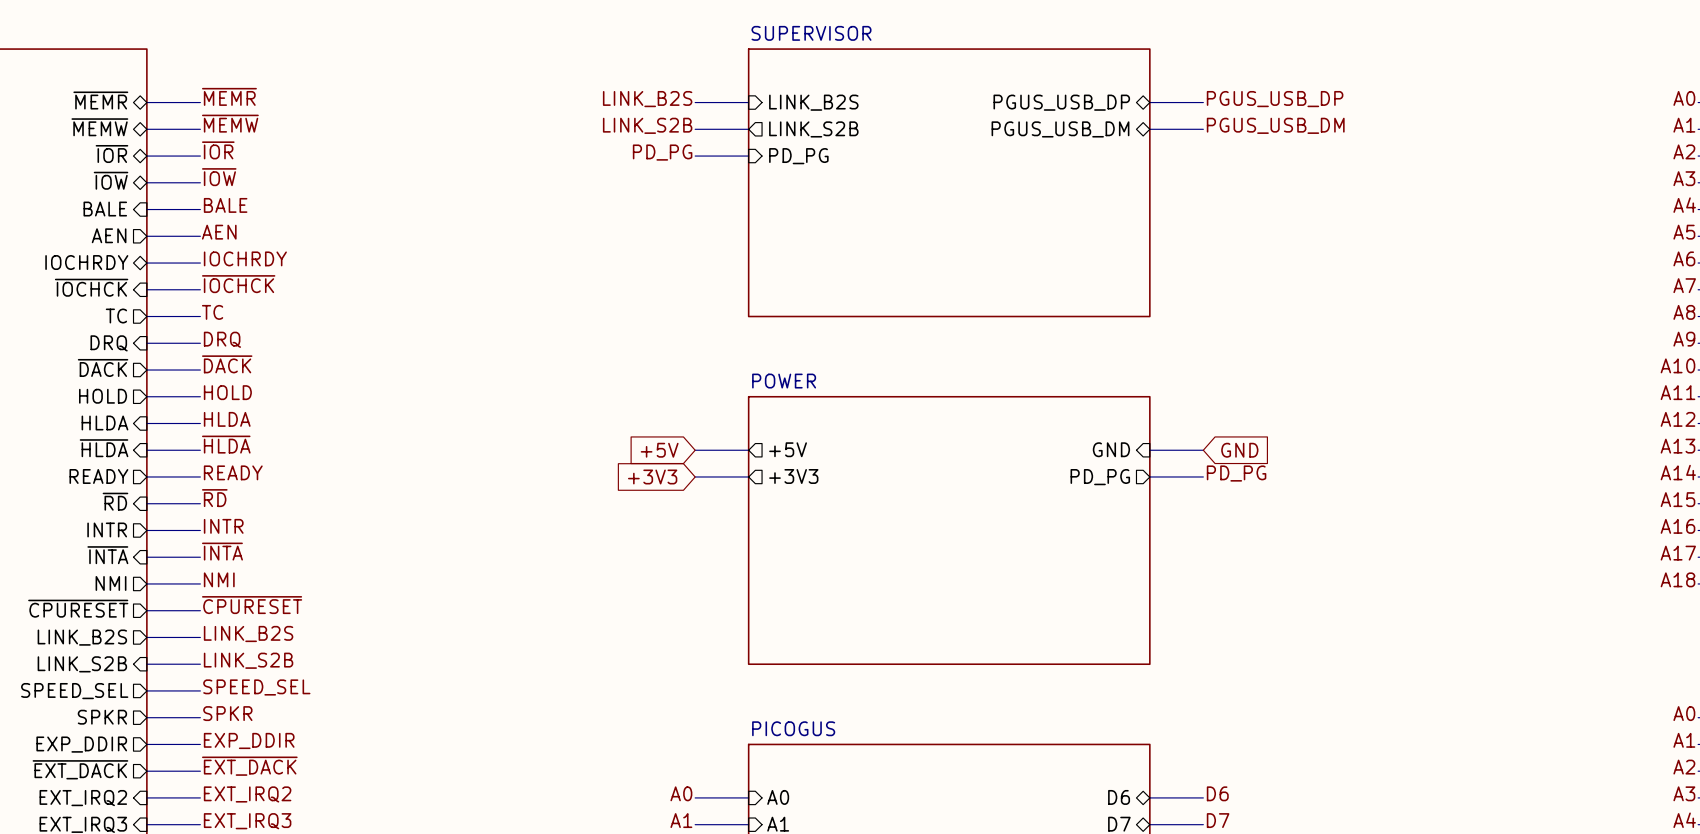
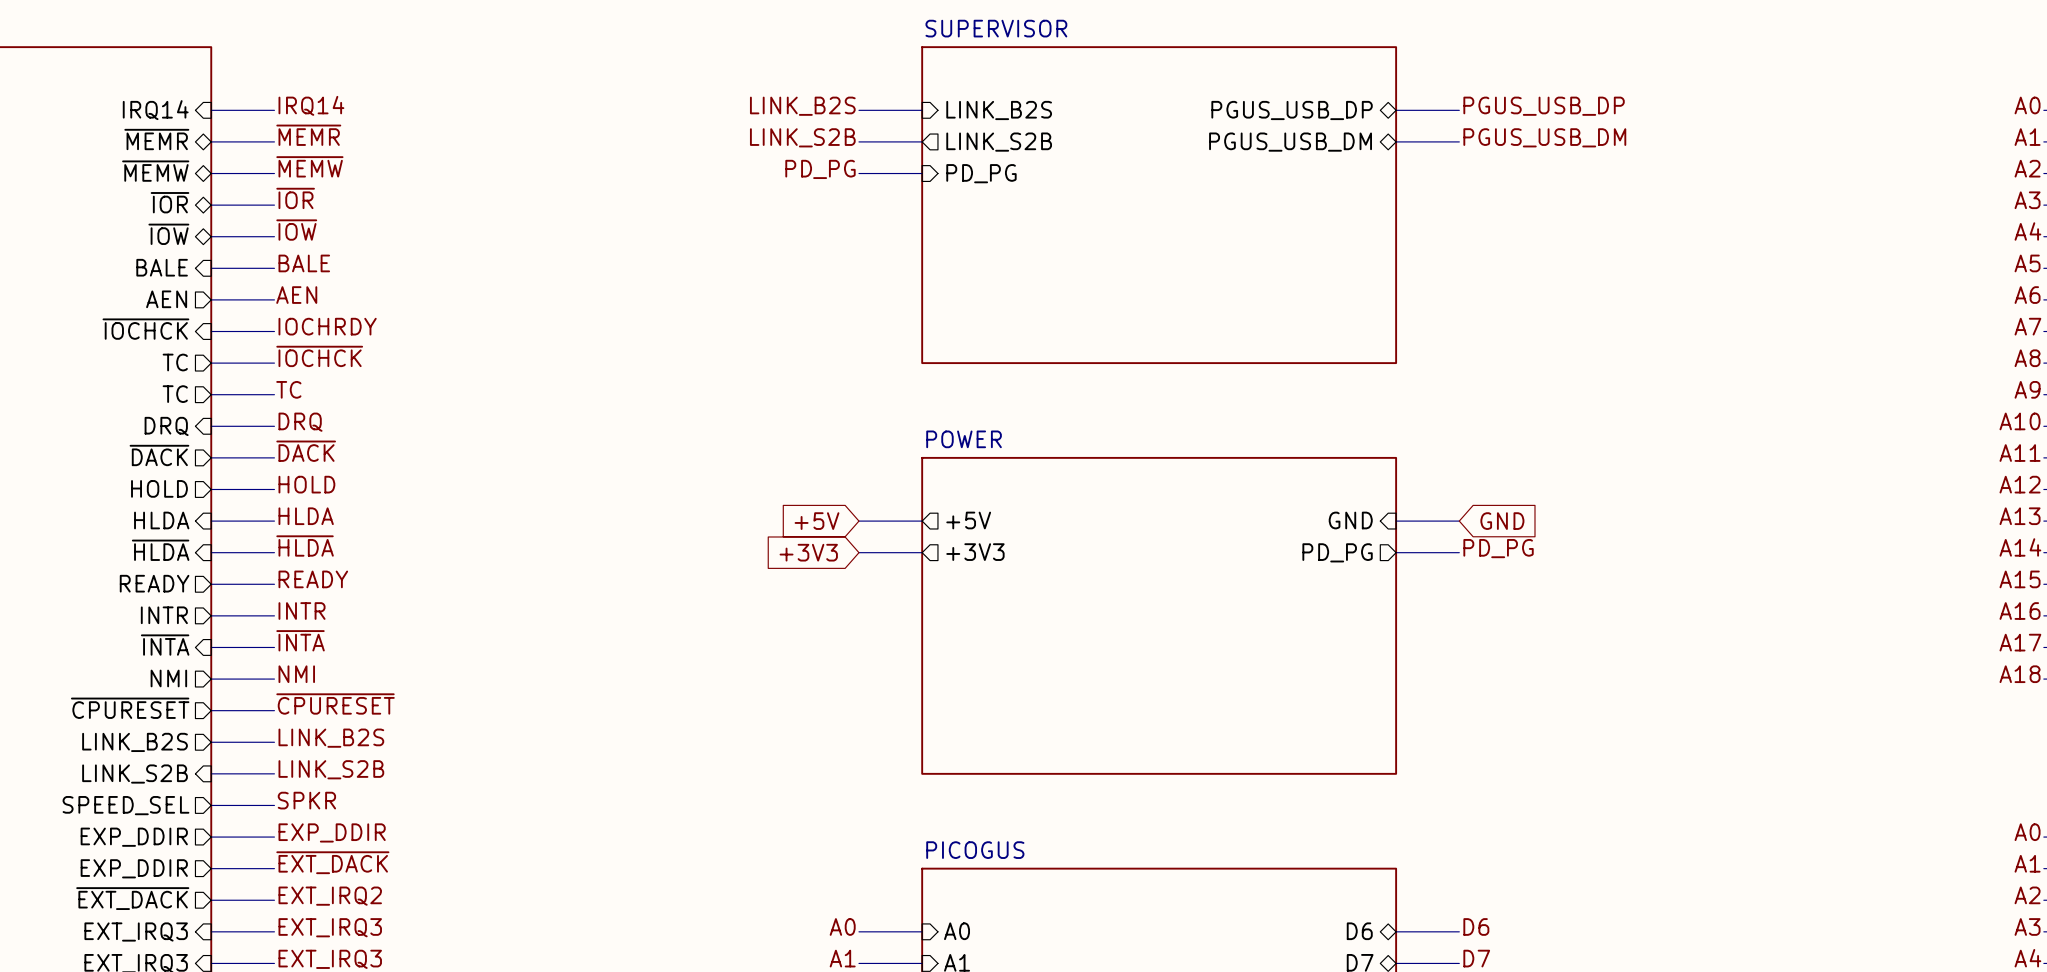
label: ~{MEMR} (229, 96) -> IRQ14 (311, 105)
sheet pin shape: bidirectional (100, 100) -> input (155, 110)
sheet pin: ~{MEMR} (100, 100) -> IRQ14 (155, 110)
label: ~{MEMW} (230, 123) -> ~{MEMR} (308, 135)
sheet pin: ~{MEMW} (99, 127) -> ~{MEMR} (156, 139)
label: ~{IOR} (218, 150) -> ~{MEMW} (309, 166)
sheet pin: ~{IOR} (111, 154) -> ~{MEMW} (155, 171)
label: ~{IOW} (219, 177) -> ~{IOR} (295, 198)
sheet pin: ~{IOW} (111, 180) -> ~{IOR} (170, 202)
label: BALE (225, 205) -> ~{IOW} (296, 230)
sheet pin shape: input (105, 209) -> bidirectional (168, 234)
sheet pin: BALE (105, 209) -> ~{IOW} (168, 234)
label: AEN (219, 232) -> BALE (304, 263)
sheet pin shape: output (109, 235) -> input (162, 267)
sheet pin: AEN (109, 235) -> BALE (162, 267)
label: IOCHRDY (245, 258) -> AEN (296, 295)
sheet pin shape: bidirectional (86, 262) -> output (166, 299)
sheet pin: IOCHRDY (86, 262) -> AEN (166, 299)
label: ~{IOCHCK} (238, 284) -> IOCHRDY (327, 326)
label: TC (212, 312) -> ~{IOCHCK} (319, 356)
label: DRQ (222, 339) -> TC (288, 389)
sheet pin shape: input (109, 343) -> output (175, 394)
sheet pin: DRQ (109, 343) -> TC (175, 394)
label: ~{DACK} (227, 364) -> DRQ (300, 422)
sheet pin shape: output (103, 367) -> input (166, 426)
sheet pin: ~{DACK} (103, 367) -> DRQ (166, 426)
label: HOLD (227, 392) -> ~{DACK} (306, 451)
sheet pin: HOLD (103, 396) -> ~{DACK} (159, 455)
label: HLDA (227, 419) -> HOLD (306, 484)
sheet pin shape: input (104, 423) -> output (159, 488)
sheet pin: HLDA (104, 423) -> HOLD (159, 488)
label: ~{HLDA} (226, 444) -> HLDA (306, 516)
sheet pin: ~{HLDA} (104, 448) -> HLDA (161, 520)
label: READY (233, 472) -> ~{HLDA} (305, 546)
sheet pin shape: output (98, 476) -> input (160, 550)
sheet pin: READY (98, 476) -> ~{HLDA} (160, 550)
label: ~{RD} (214, 498) -> READY (313, 579)
sheet pin shape: input (115, 501) -> output (154, 583)
sheet pin: ~{RD} (115, 501) -> READY (154, 583)
label: SPEED_SEL (256, 687) -> SPKR (306, 800)
label: SPKR (227, 713) -> EXP_DDIR (332, 832)
sheet pin: SPKR (102, 717) -> EXP_DDIR (134, 837)
label: EXP_DDIR (249, 740) -> ~{EXT_DACK} (332, 862)
label: ~{EXT_DACK} (249, 766) -> EXT_IRQ2 (330, 896)
label: EXT_IRQ2 (247, 794) -> EXT_IRQ3 (330, 927)
sheet pin: EXT_IRQ2 (83, 798) -> EXT_IRQ3 (136, 932)

